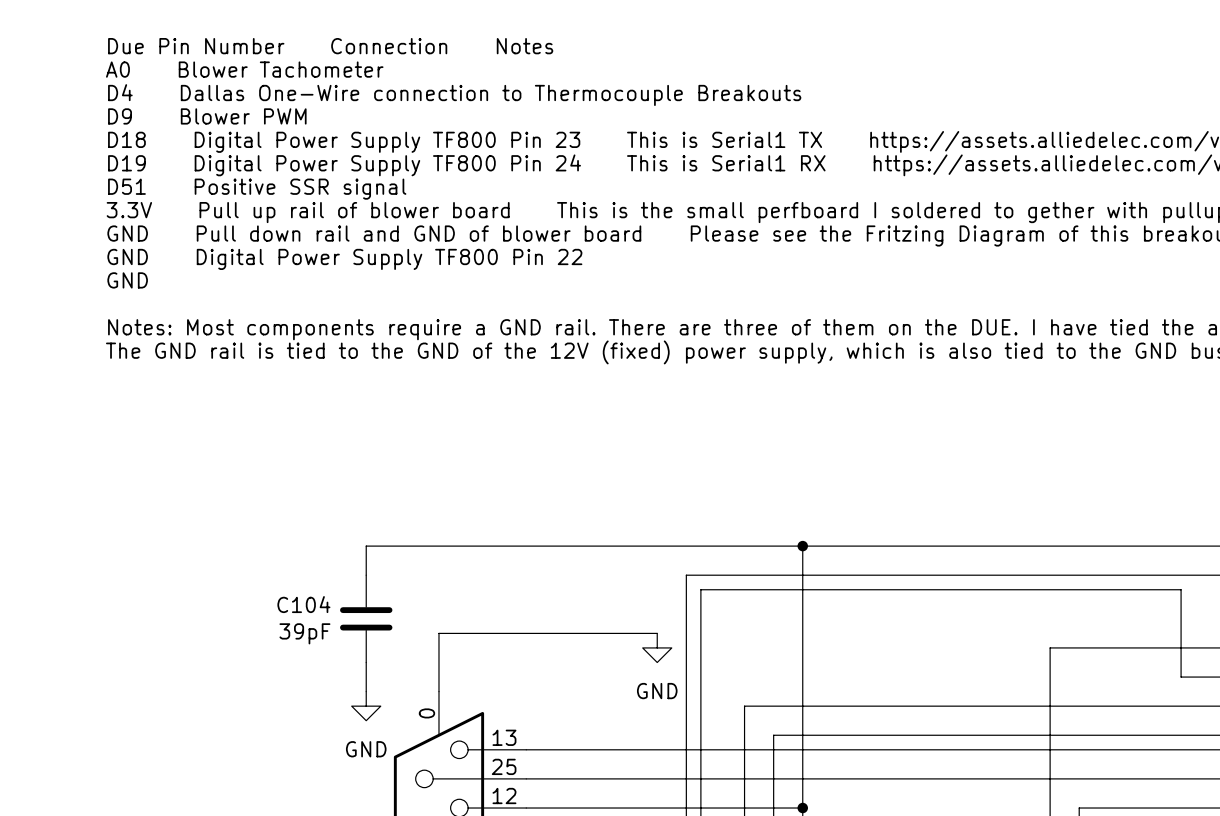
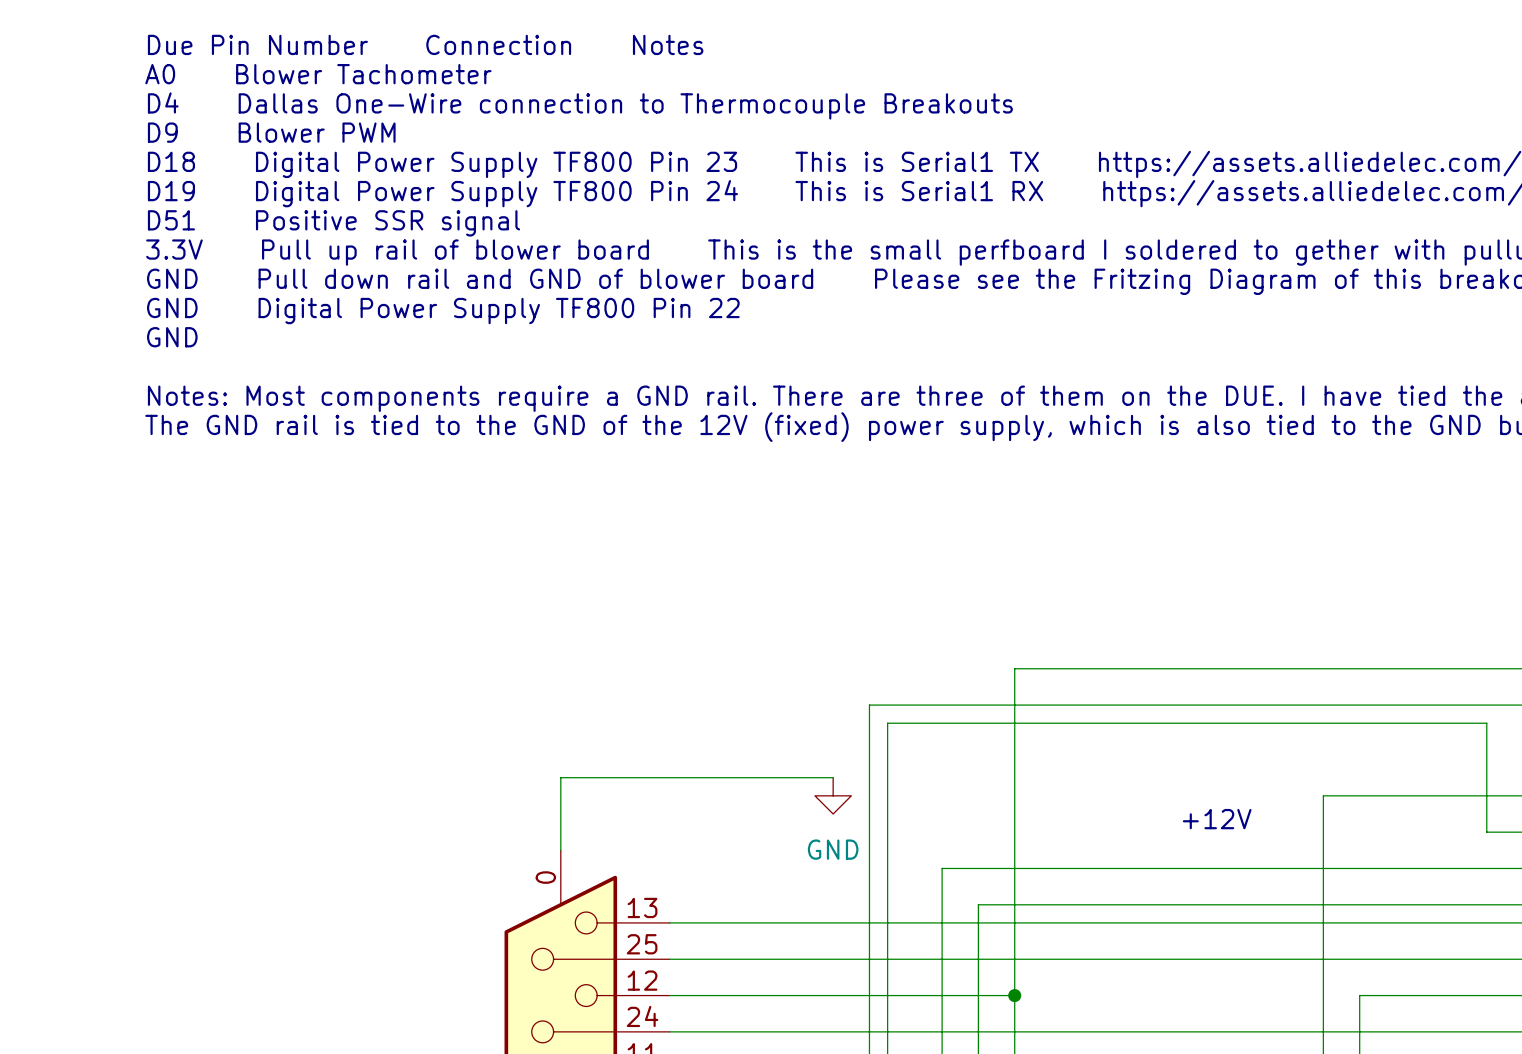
wire: (802, 546) (366, 546) (366, 575) -> none
junction: (802, 546) -> none
C104: 39pF (366, 618) -> none
wire: (366, 662) (366, 691) -> none
text: none -> +12V (1217, 819)
power symbol: GND (366, 706) -> none

